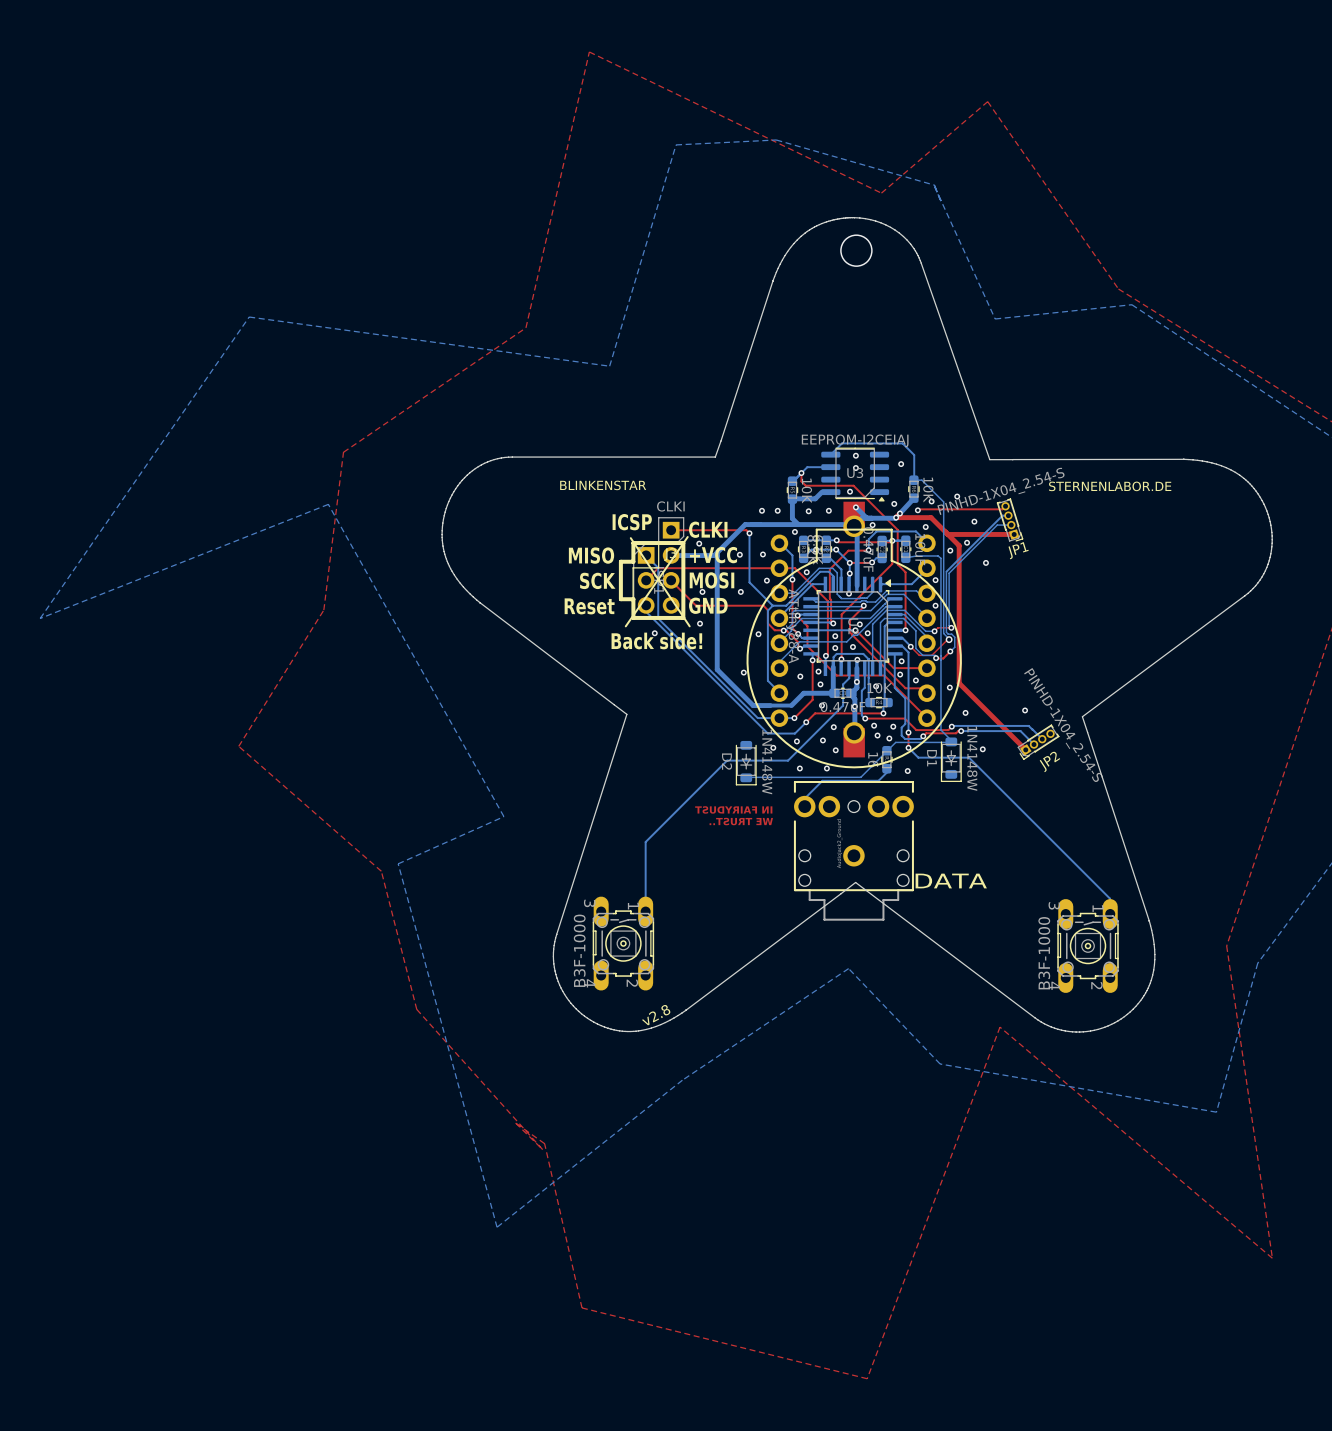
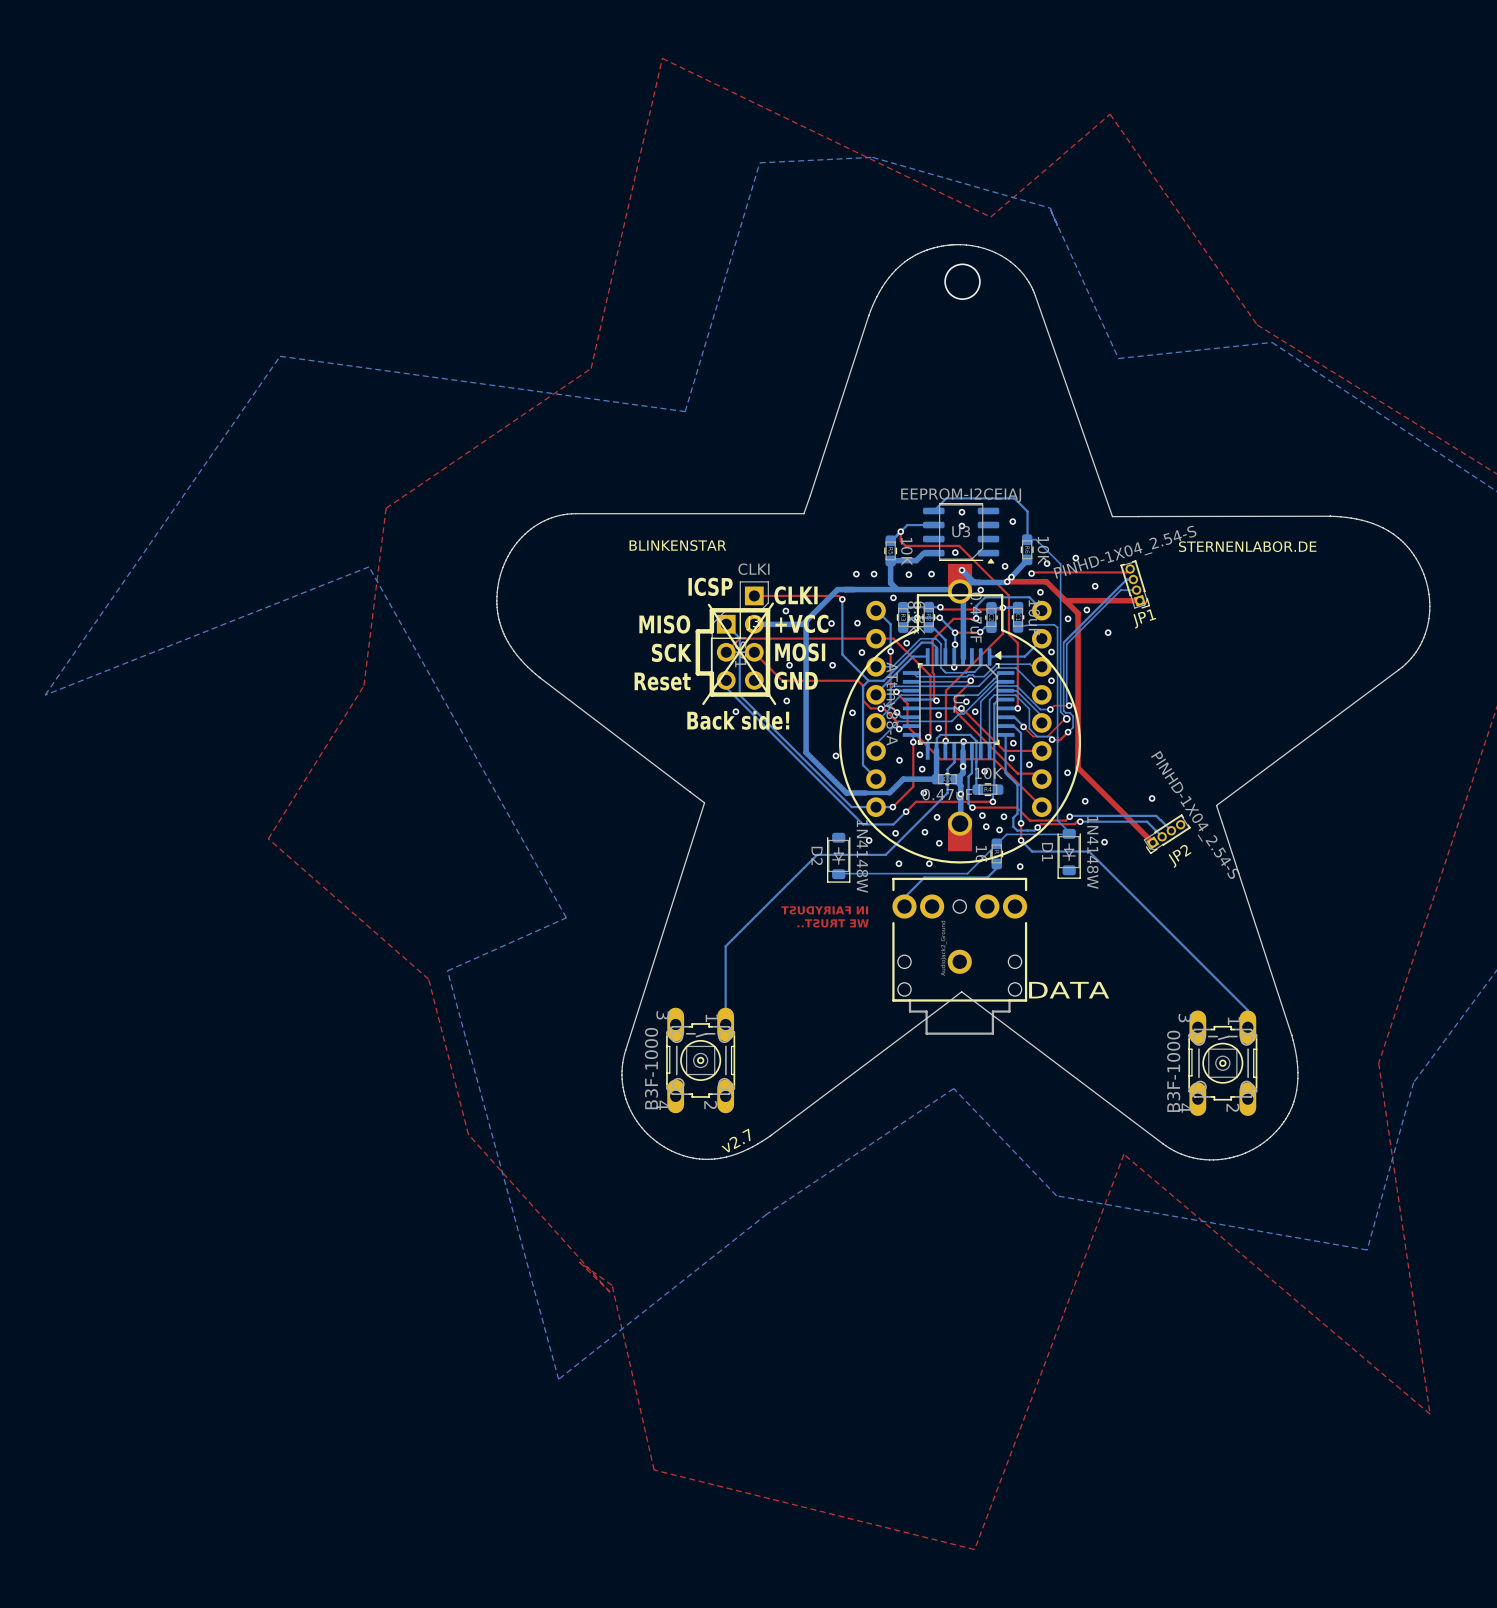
text: v2.8 (656, 1015) -> v2.7 (736, 1140)

